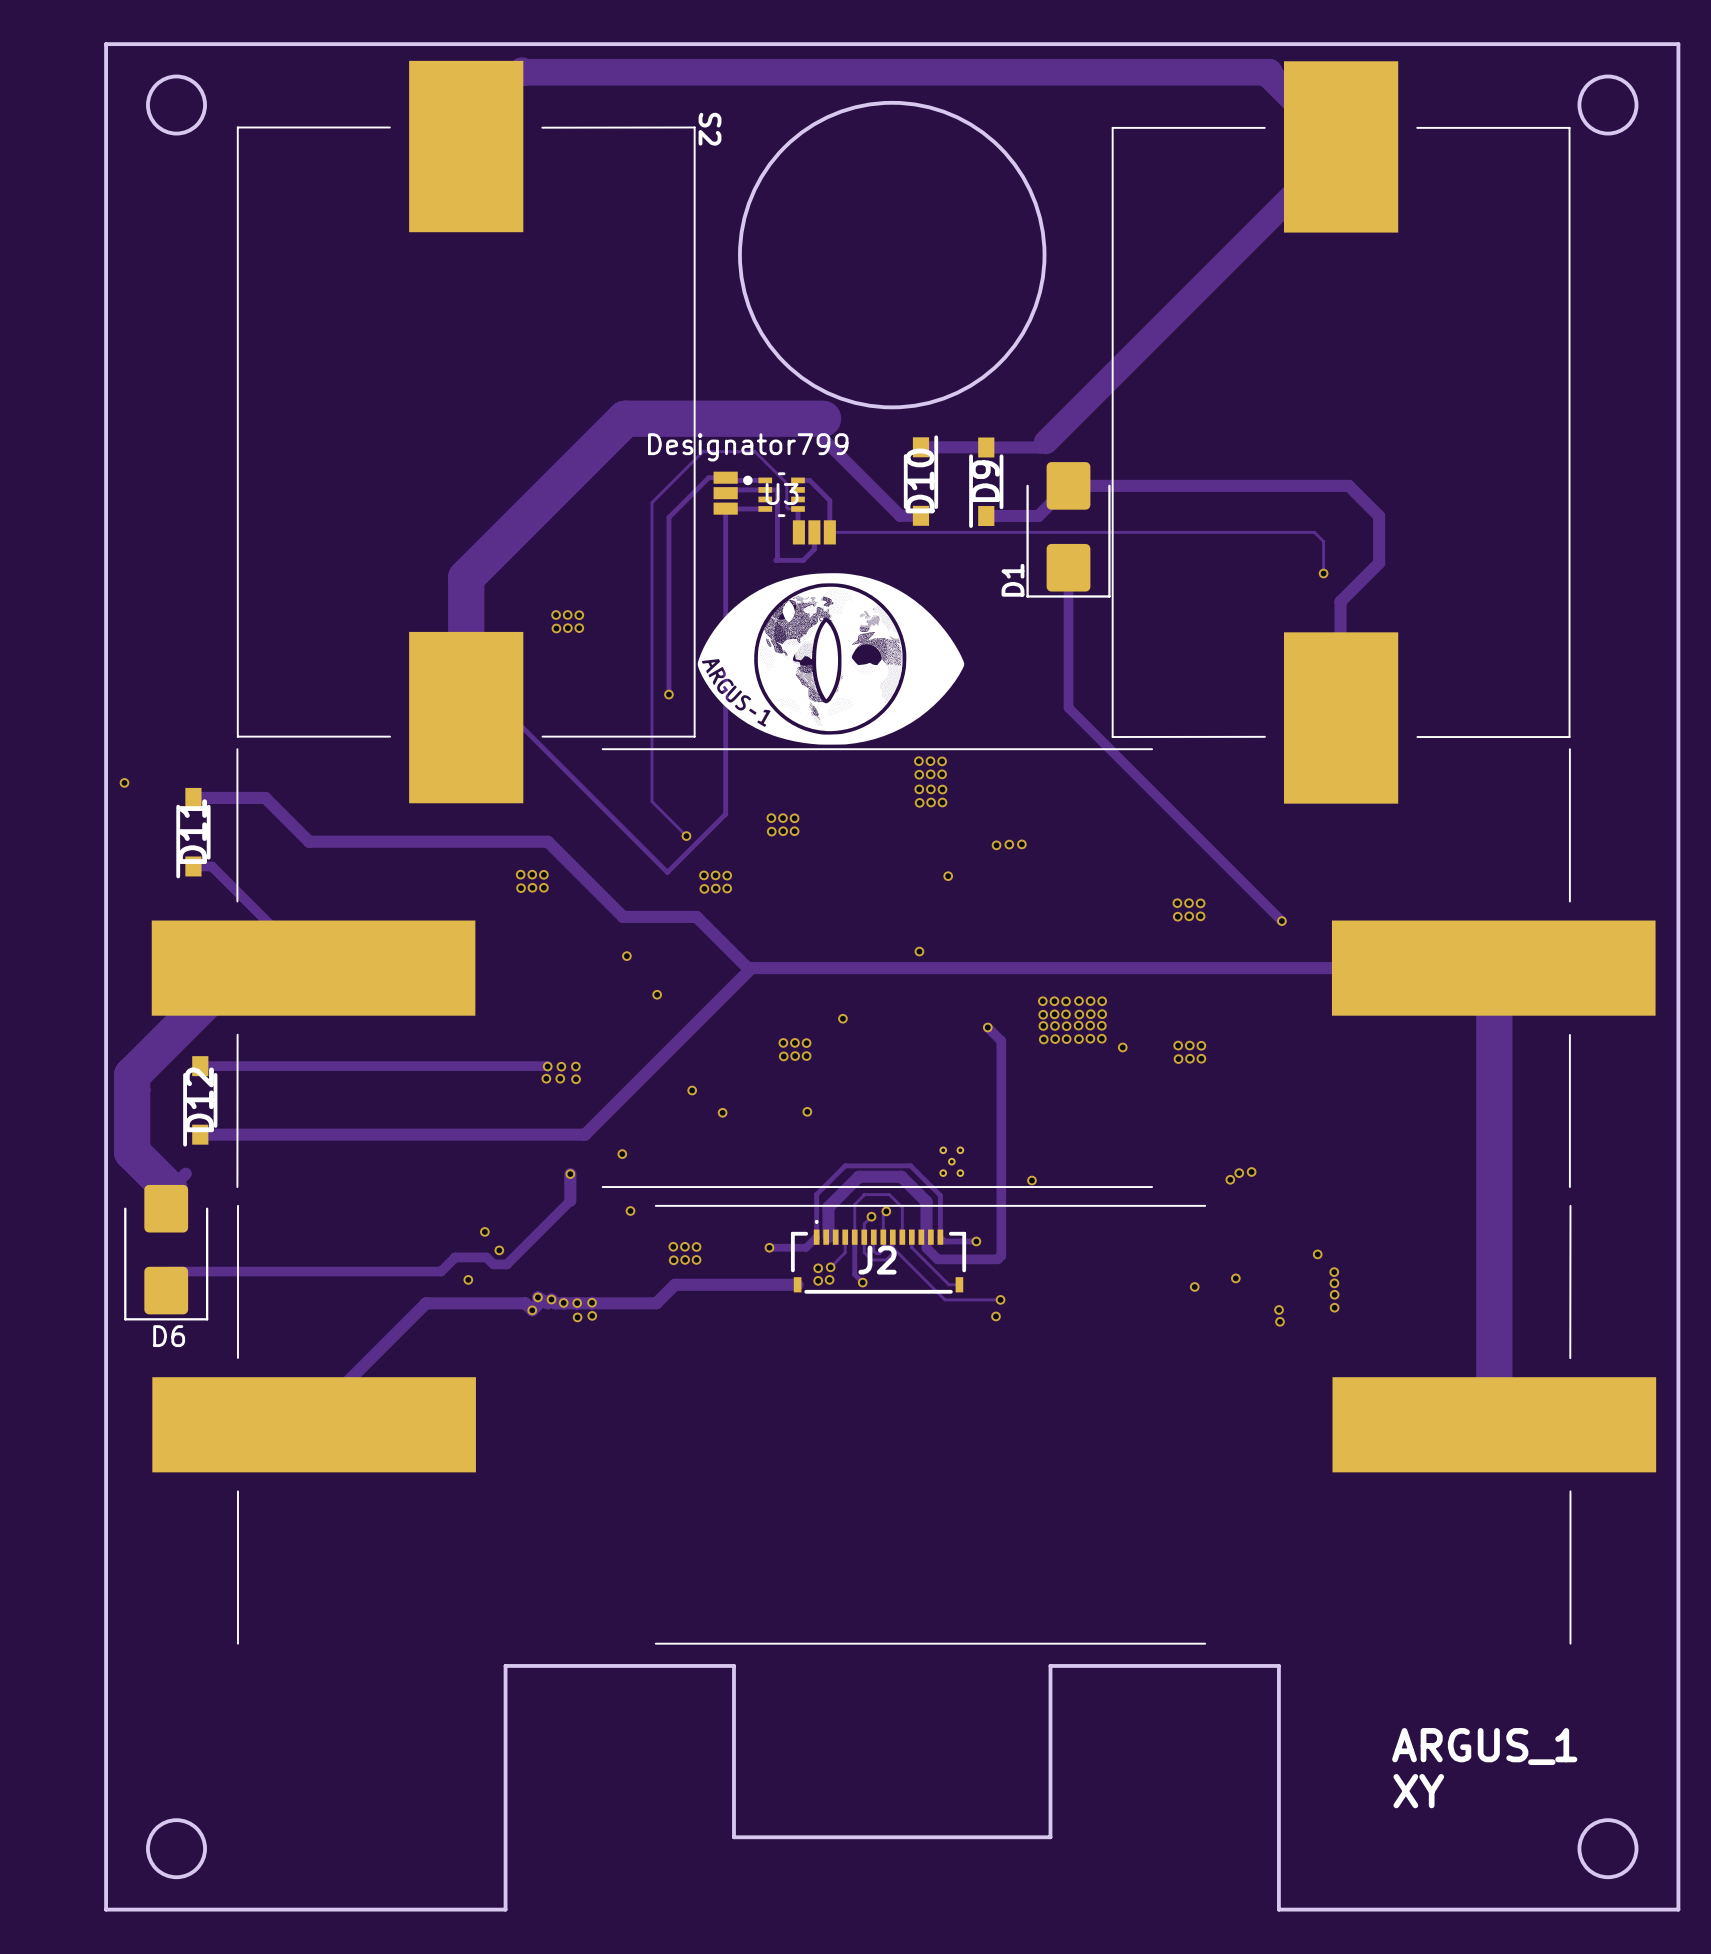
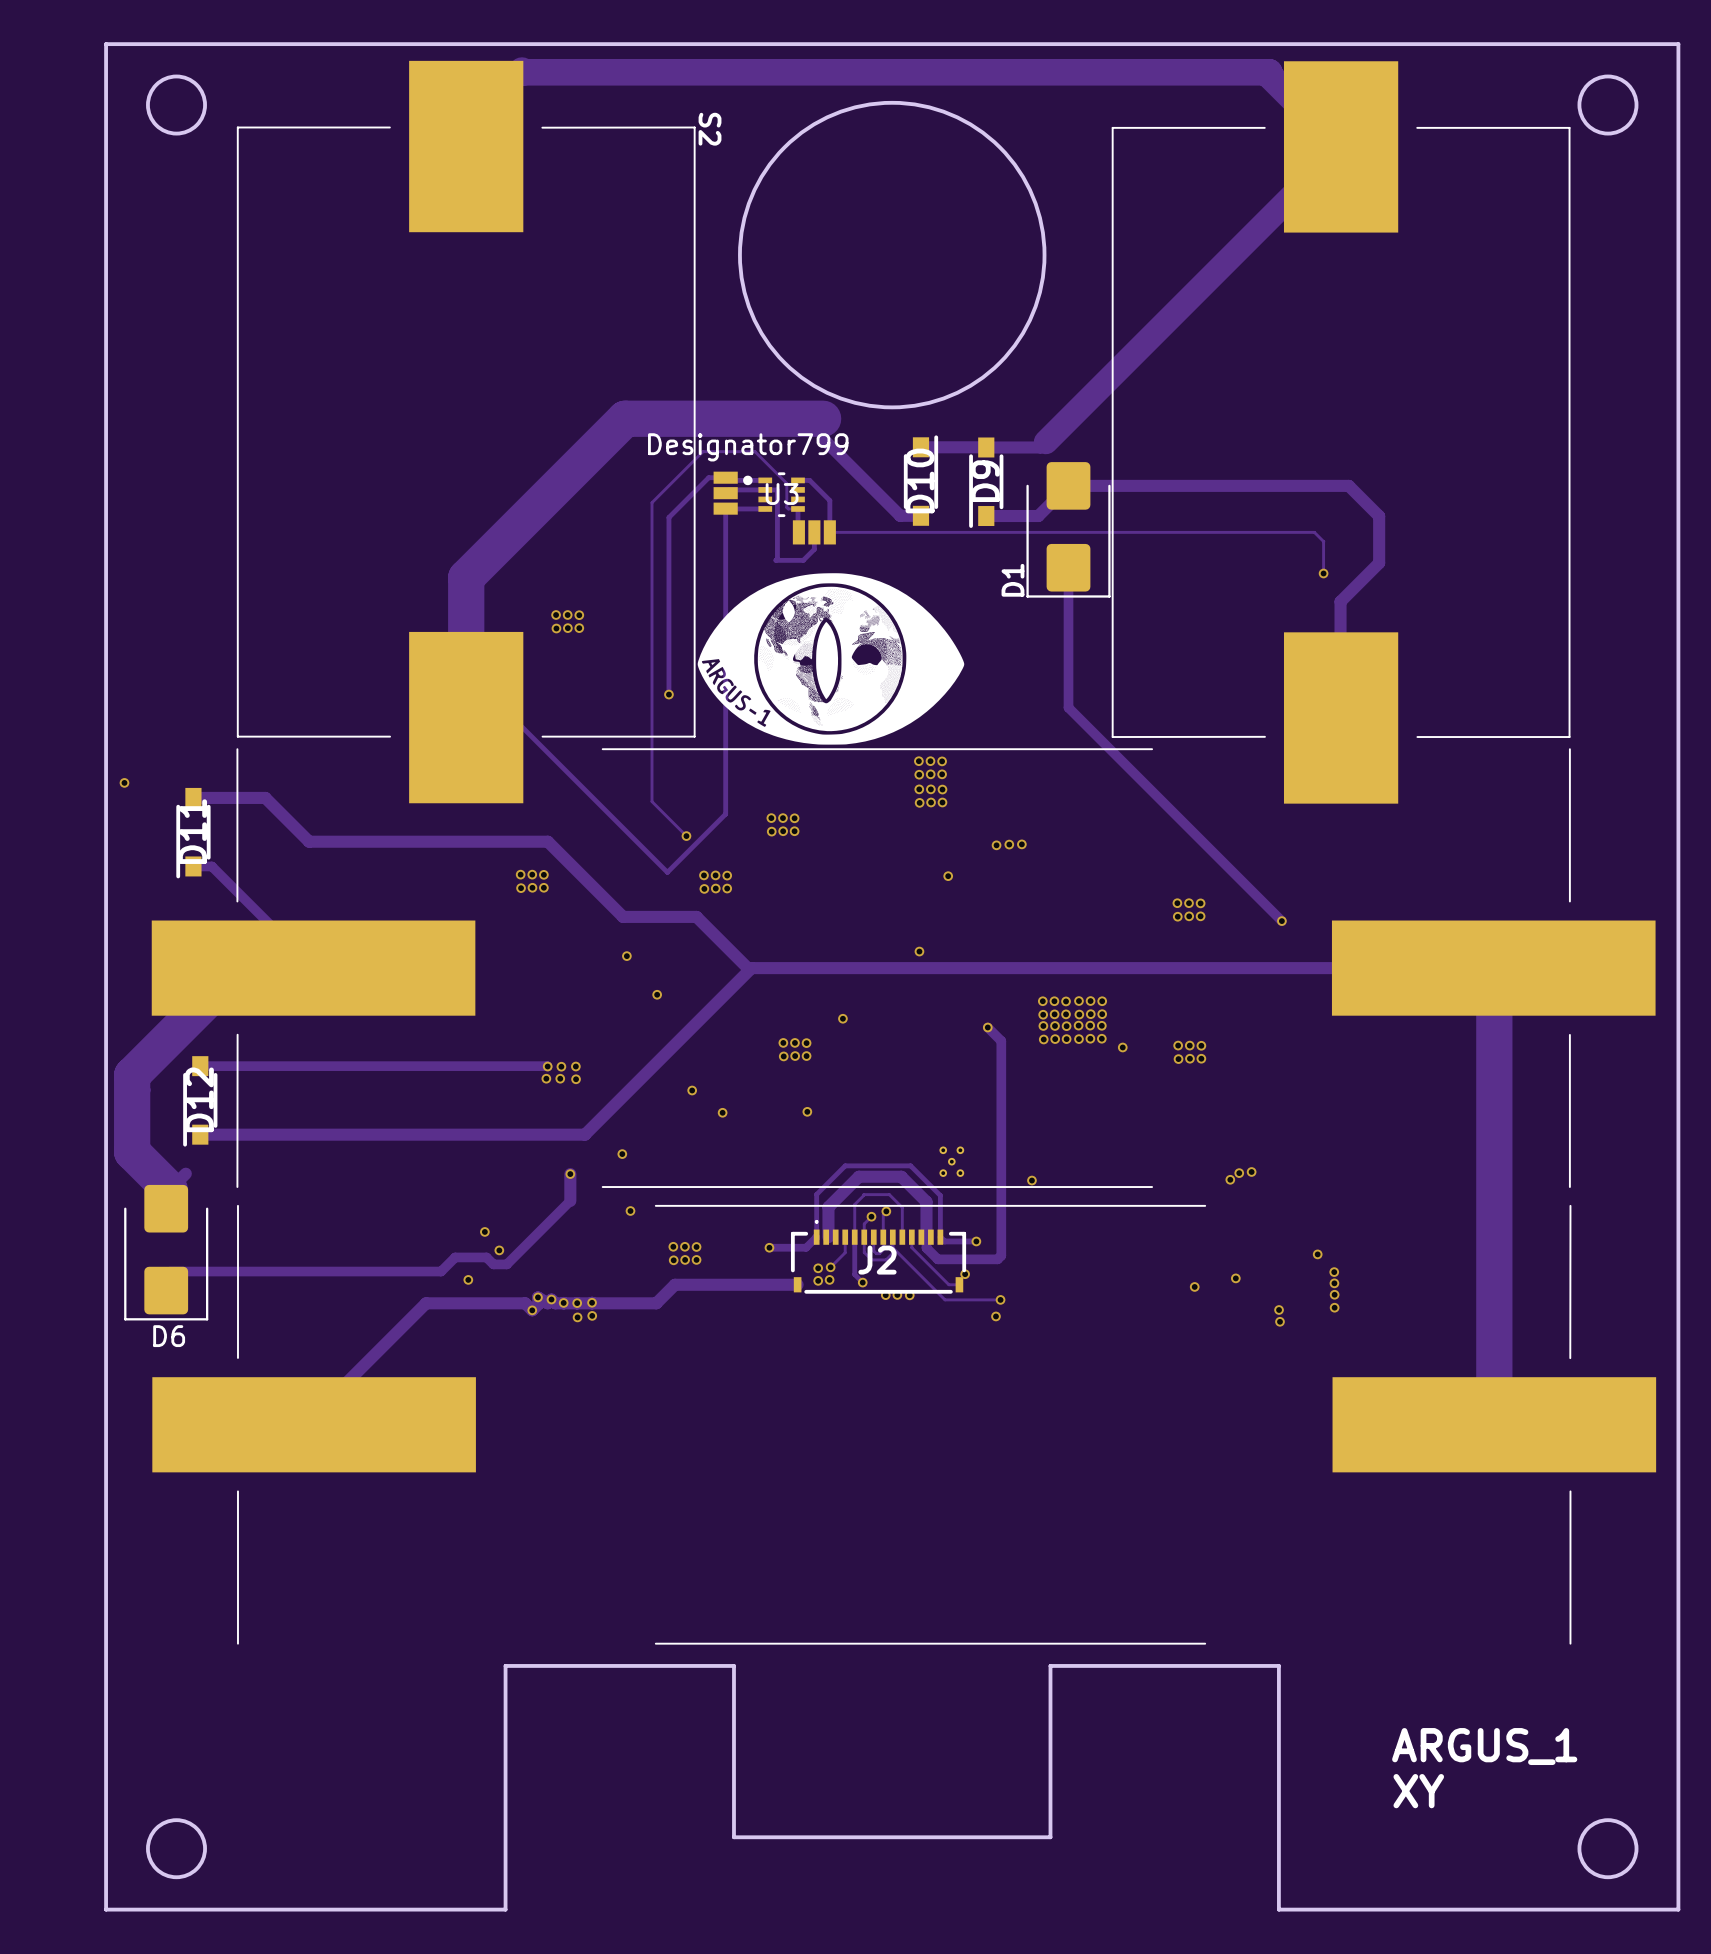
via: none -> (965, 1274)
via: none -> (897, 1294)
via: none -> (885, 1295)
via: none -> (909, 1295)

